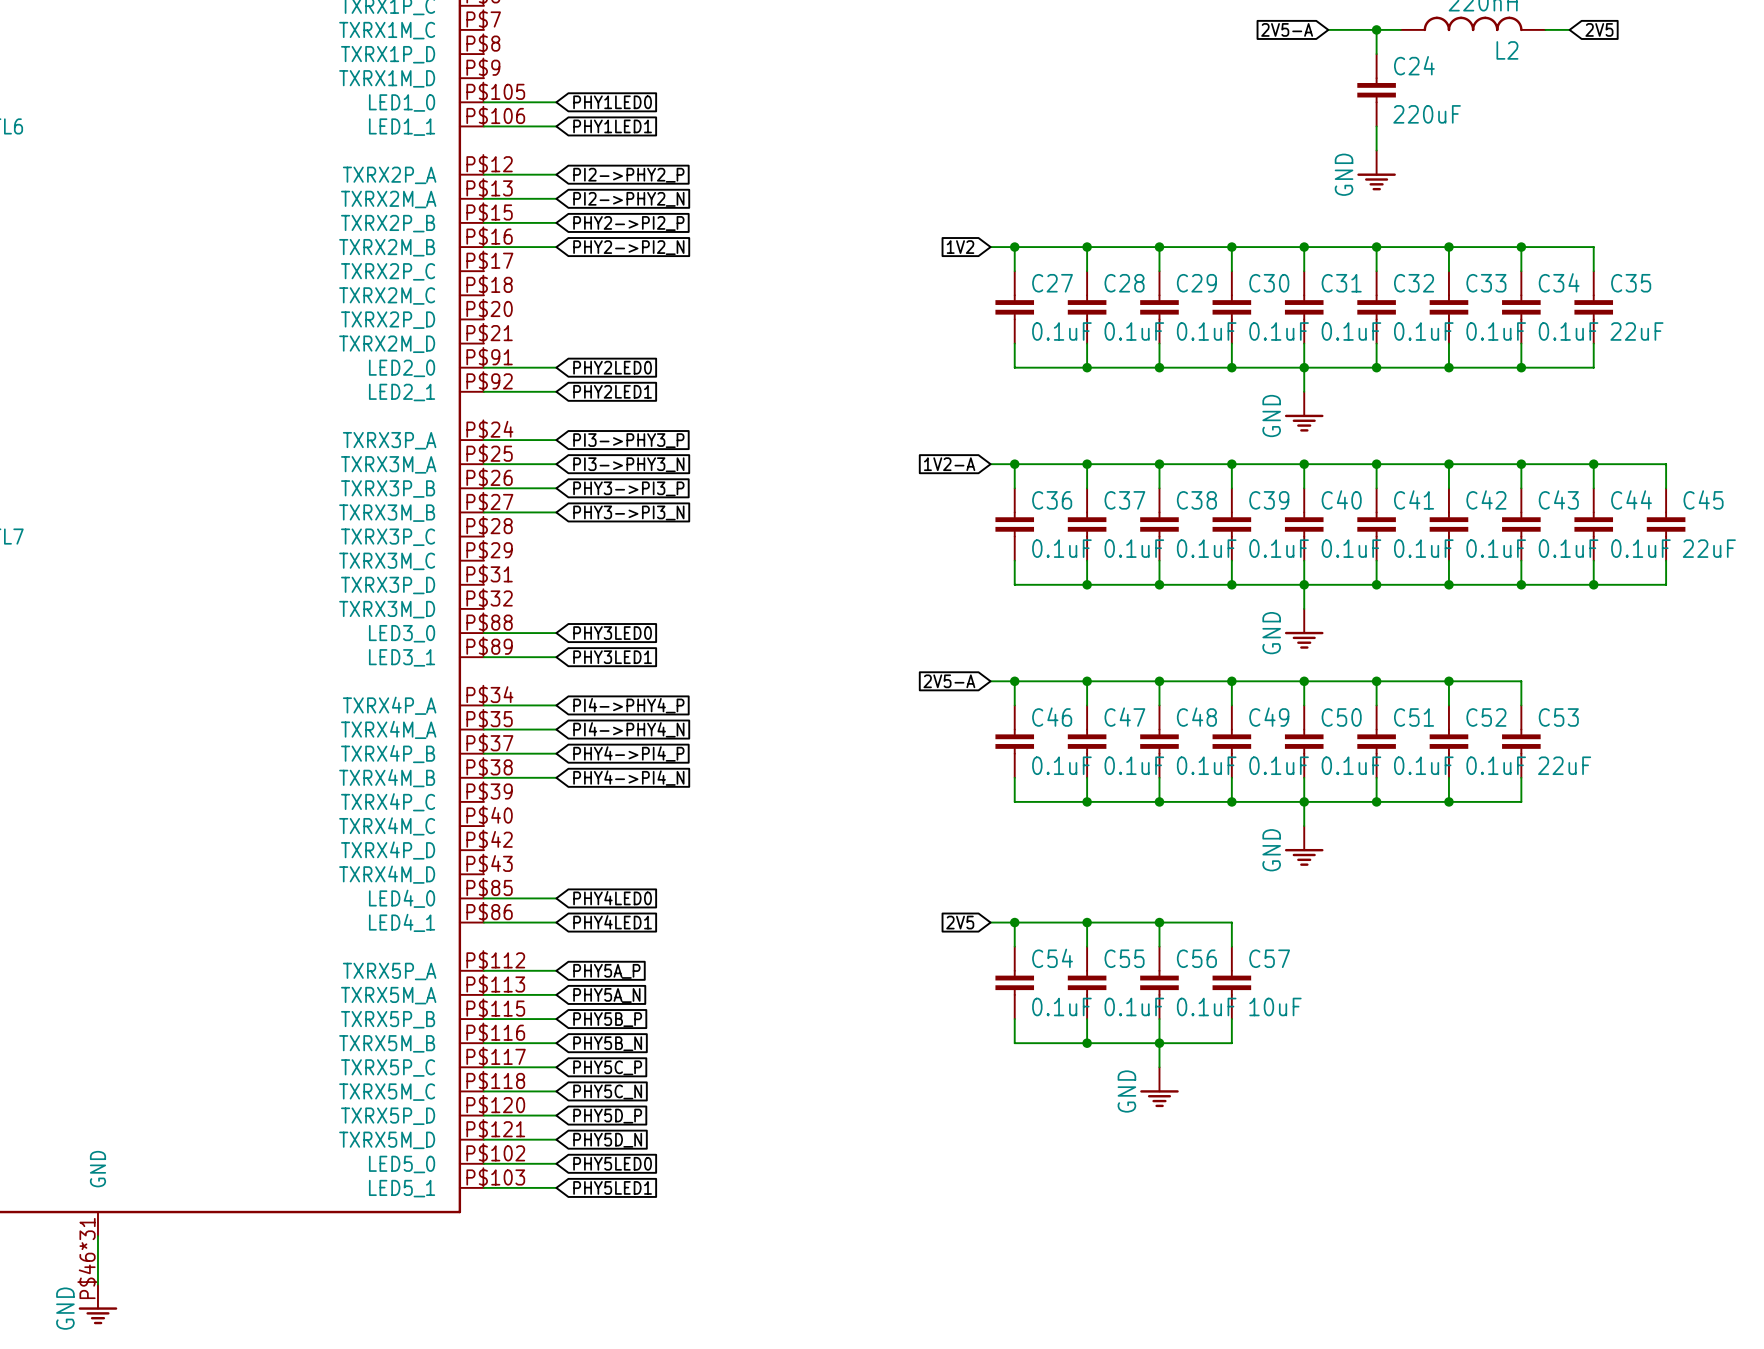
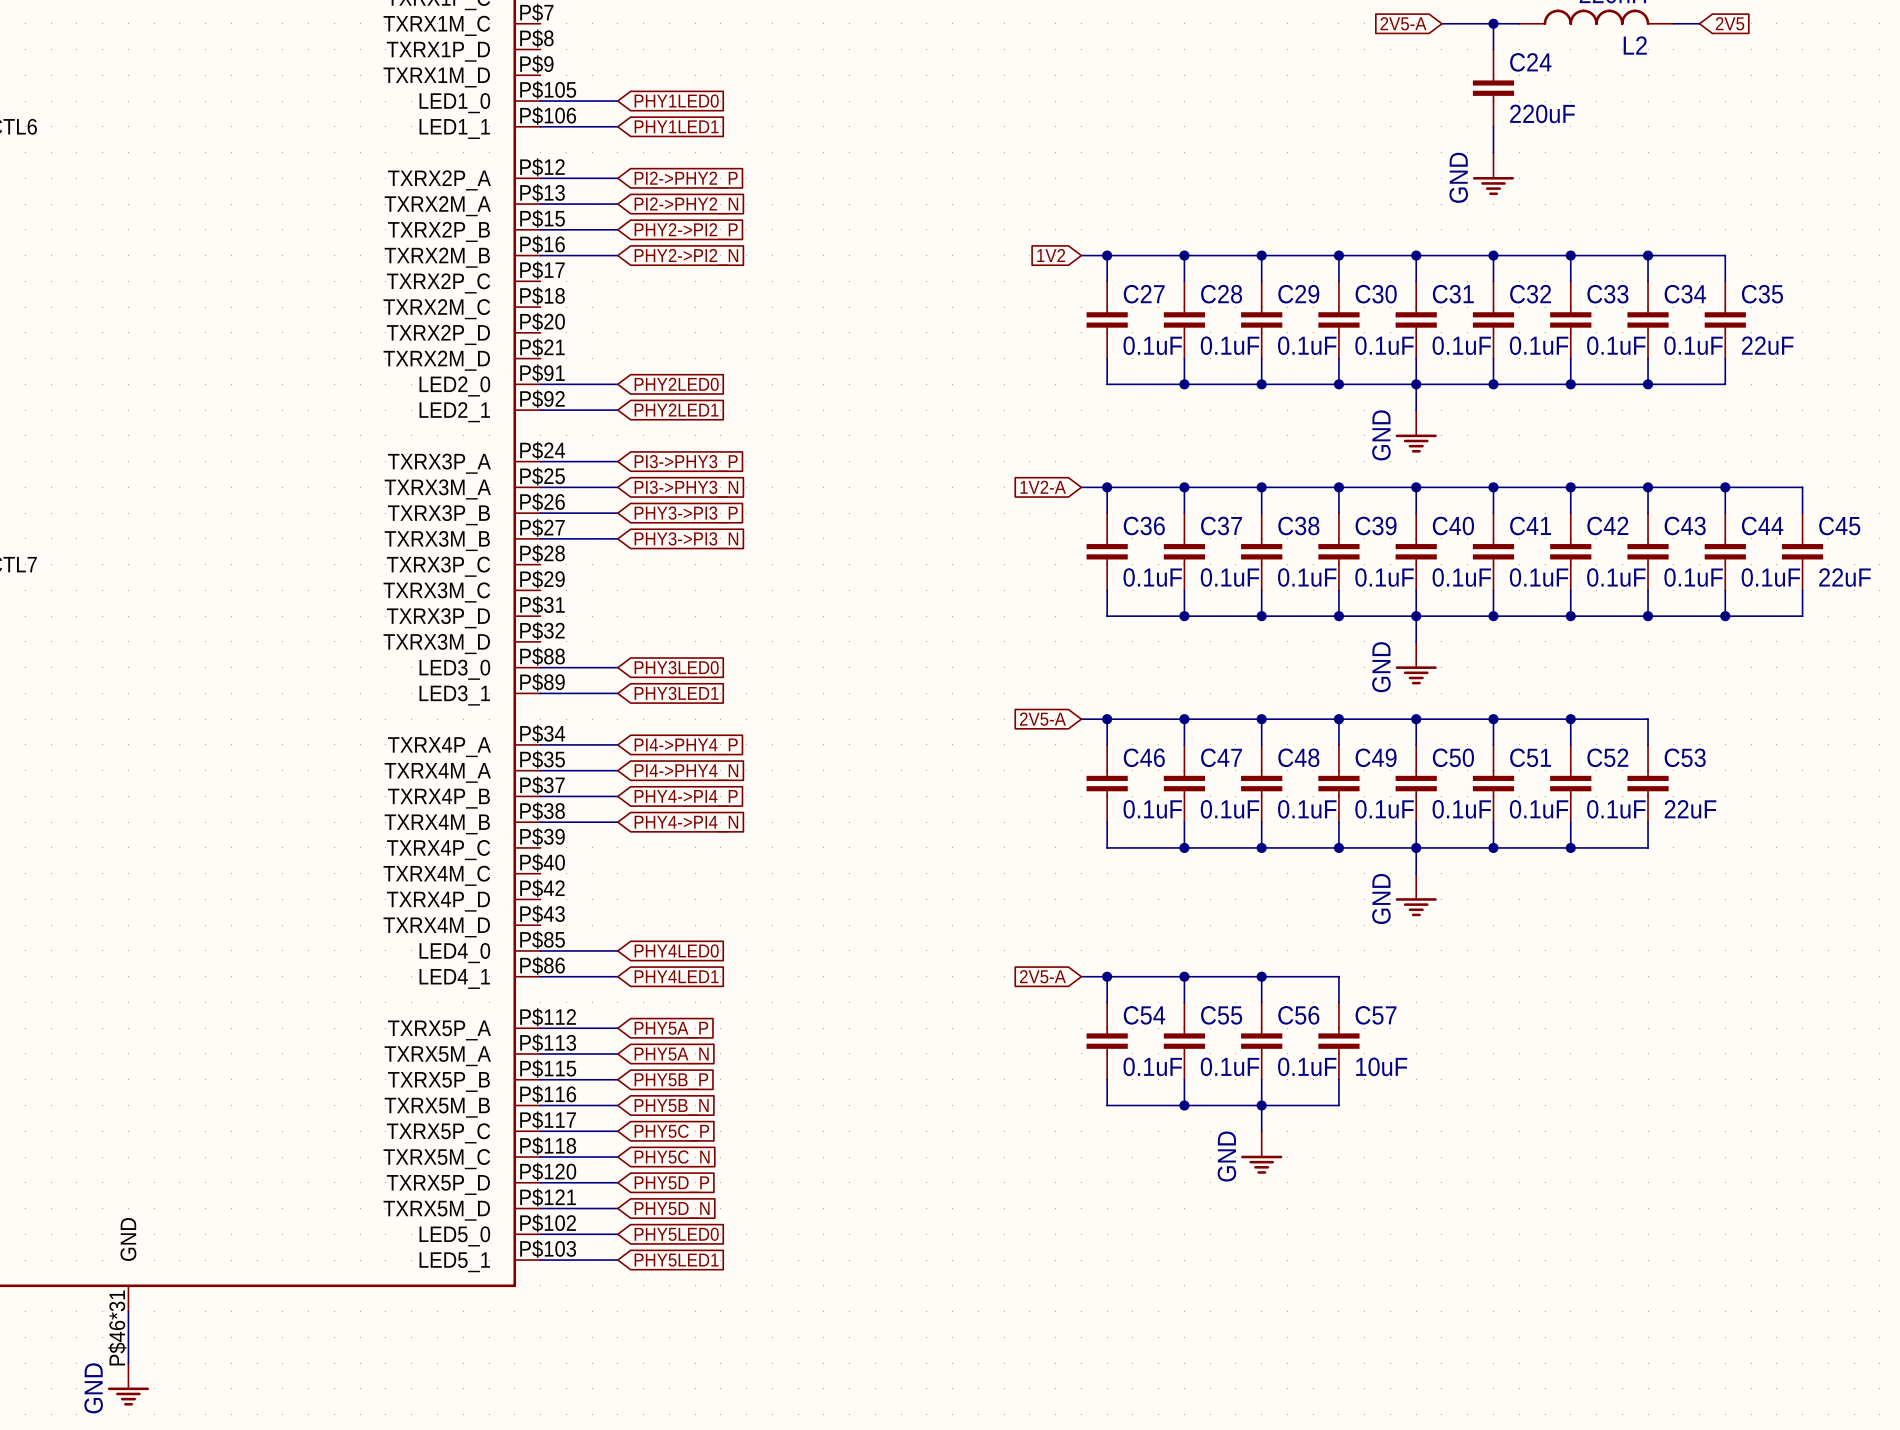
global label: 2V5 (960, 922) -> 2V5-A (1042, 976)

